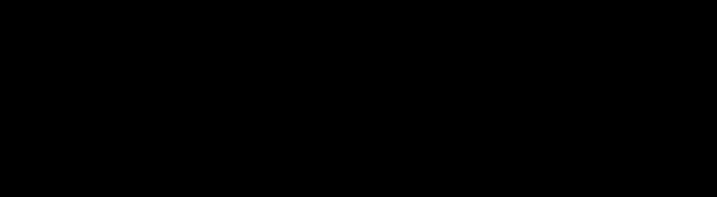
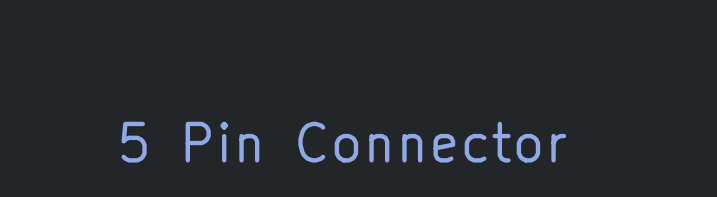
text: none -> 5 Pin Connector (343, 142)

